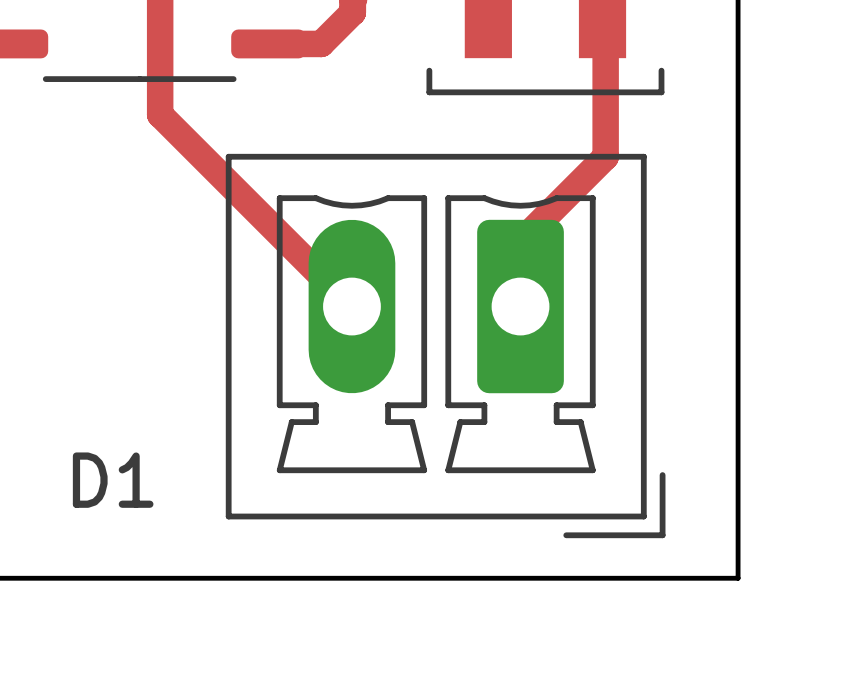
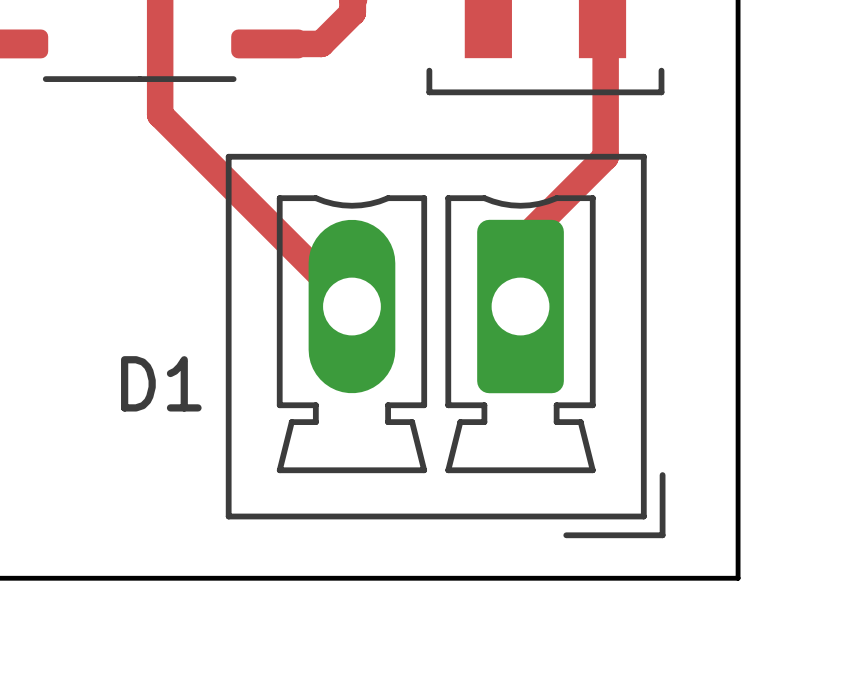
D1 name position: D1 (113, 480) -> D1 (161, 383)

